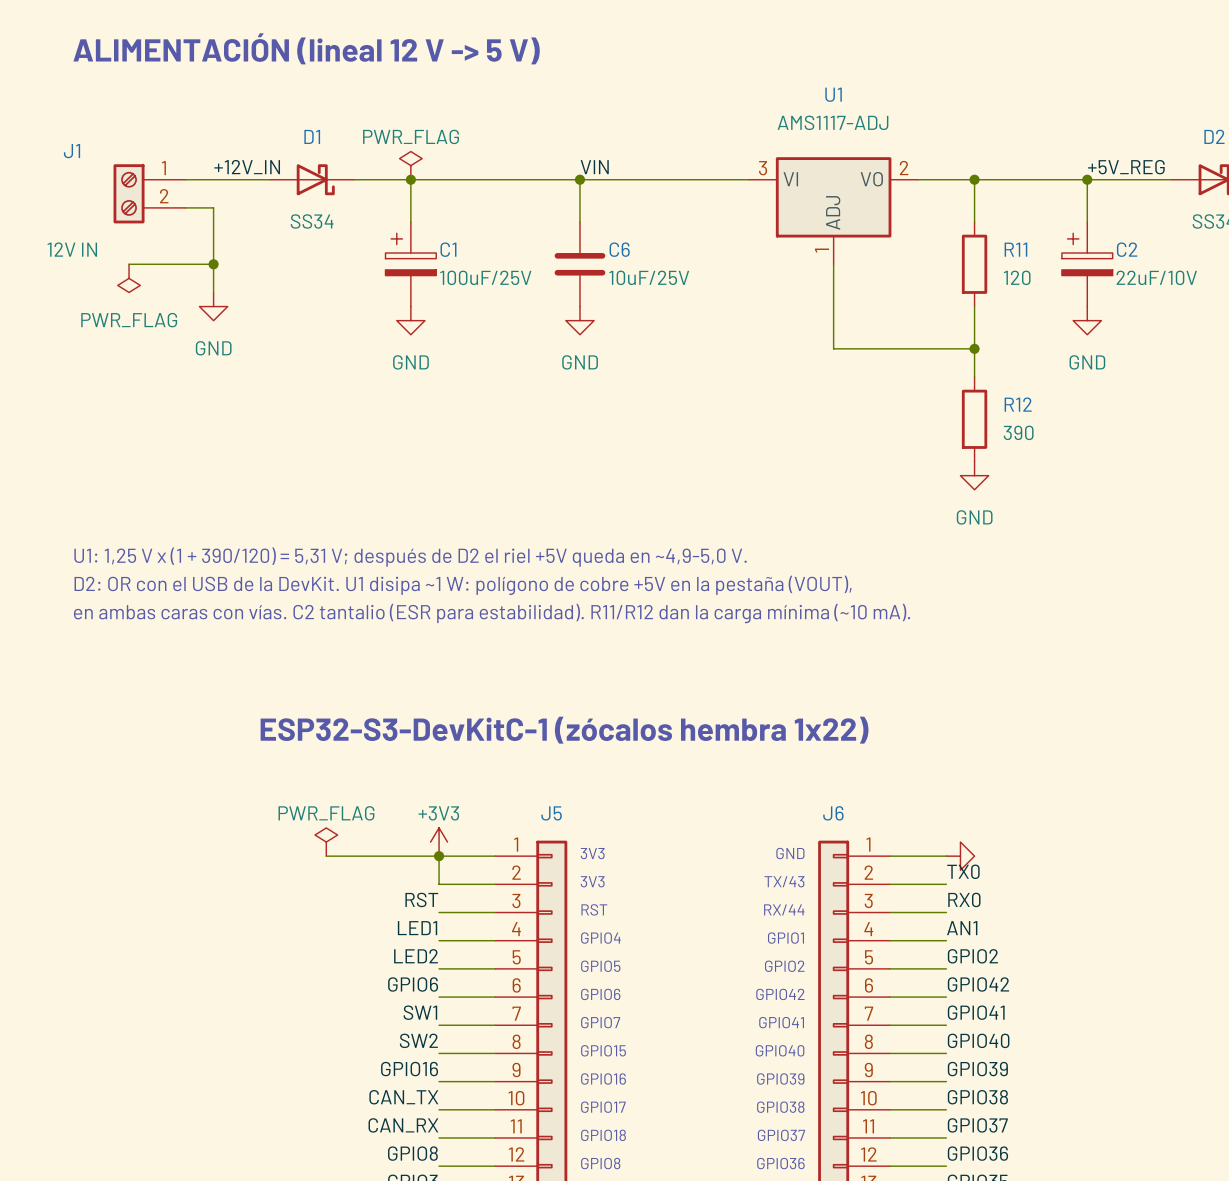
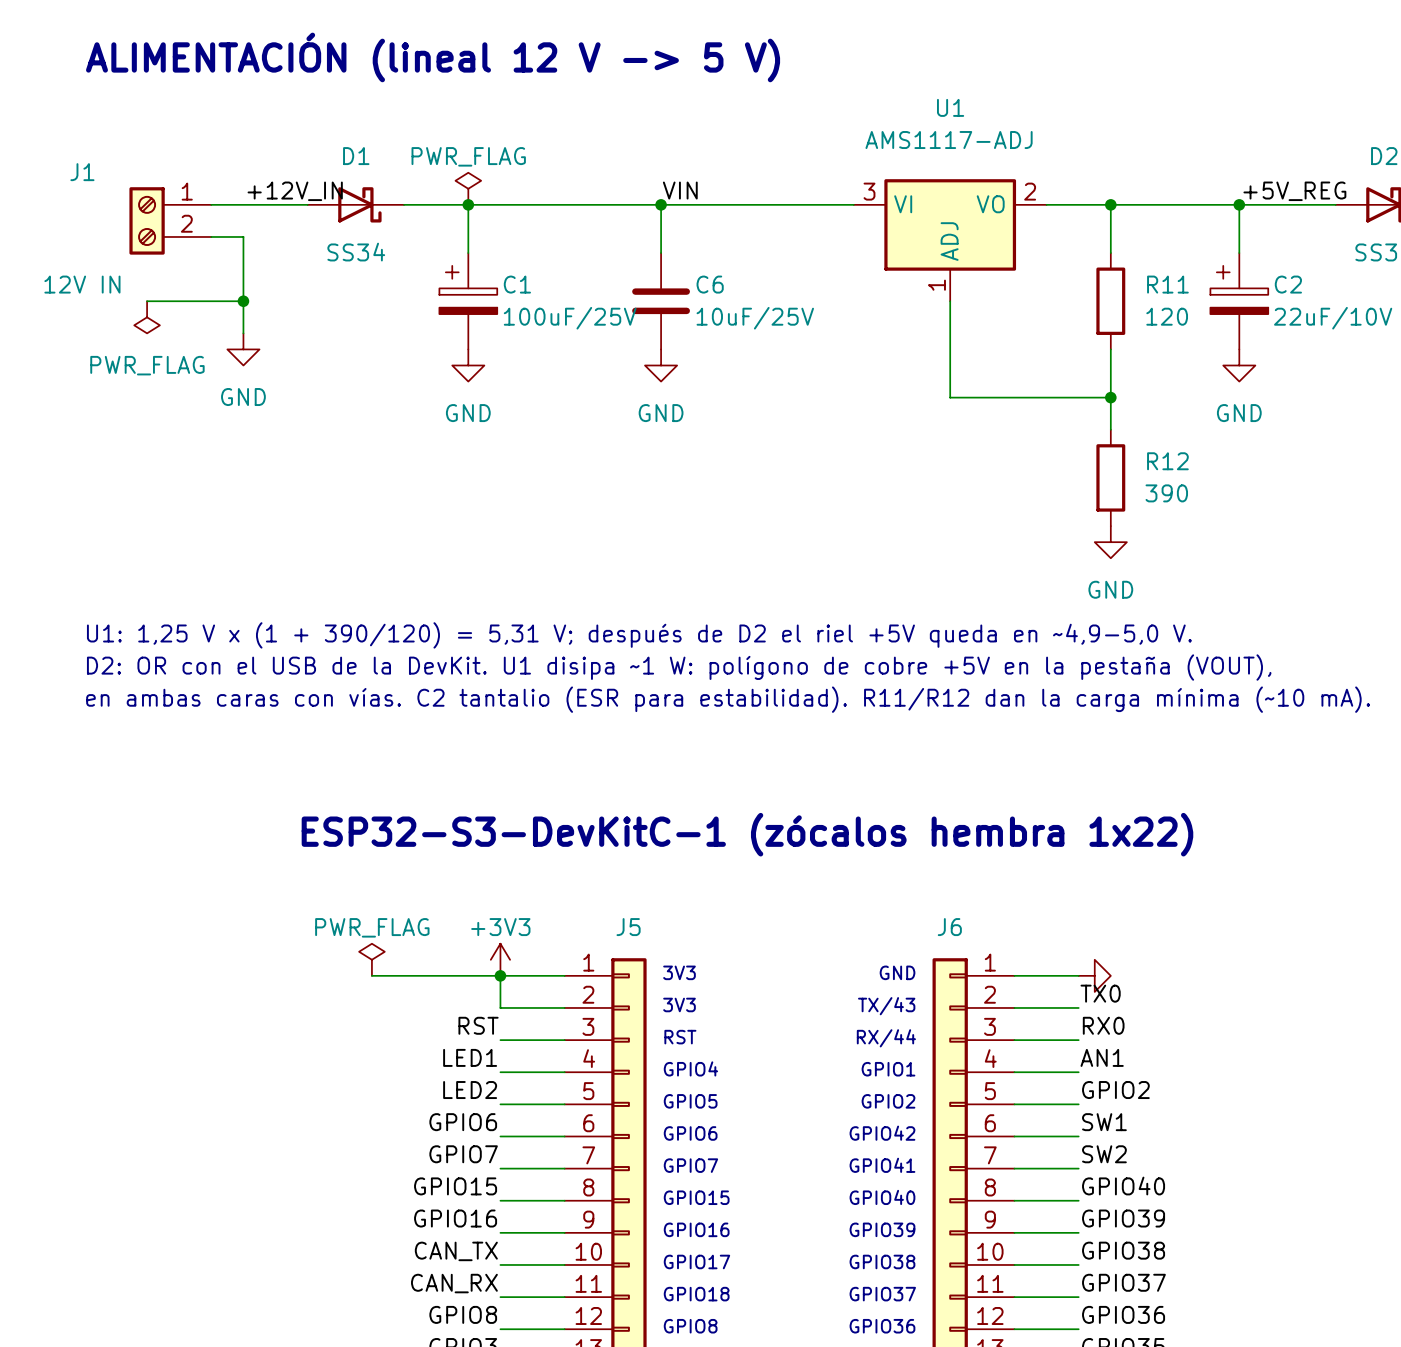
label: GPIO42 (978, 984) -> SW1 (1104, 1122)
label: SW1 (420, 1012) -> GPIO7 (463, 1154)
label: GPIO41 (976, 1012) -> SW2 (1104, 1154)
label: SW2 (418, 1040) -> GPIO15 (455, 1186)

